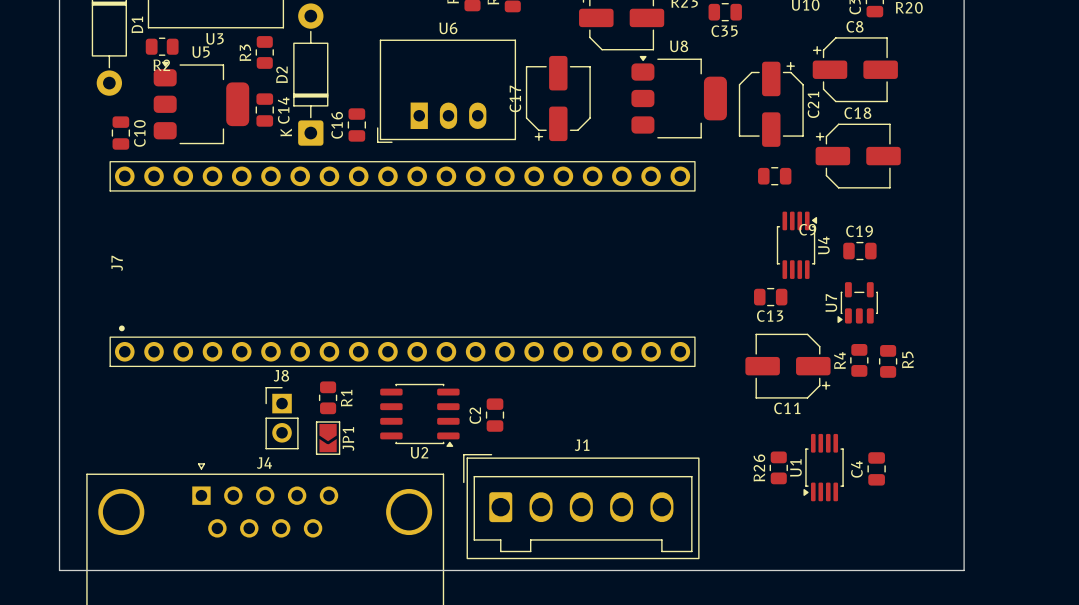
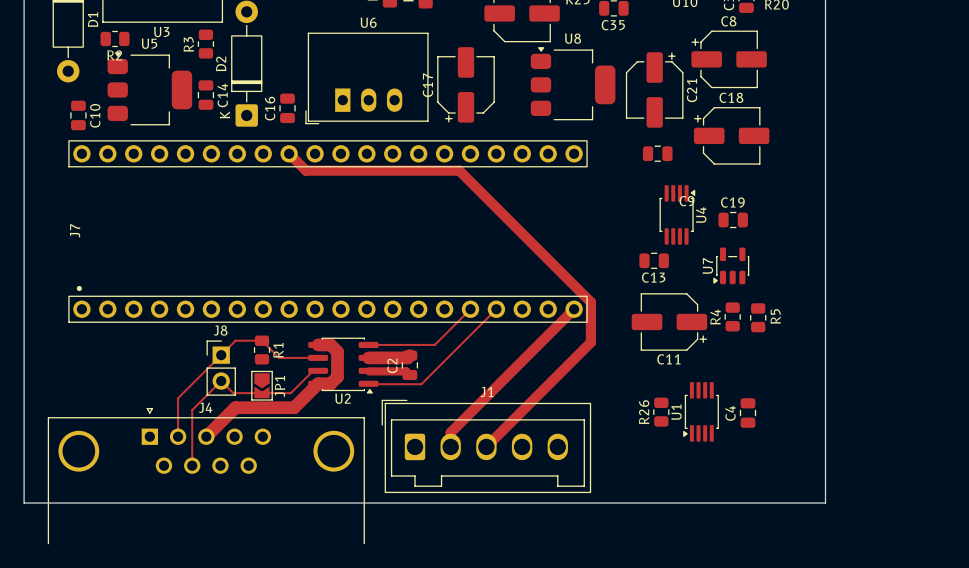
track: none -> (289, 153) (305, 170) (459, 170) (590, 302) (590, 342) (486, 446)
track: none -> (470, 309) (434, 344) (368, 344)
track: none -> (496, 309) (421, 384) (368, 383)
track: none -> (574, 309) (450, 432) (450, 446)
track: none -> (318, 344) (330, 344) (337, 351) (337, 376) (330, 383) (318, 383) (294, 407) (235, 407) (206, 436)
track: none -> (409, 355) (407, 357) (368, 357)
track: none -> (318, 357) (279, 357) (262, 340) (235, 340) (178, 398) (178, 436)
track: none -> (318, 370) (313, 370) (290, 393) (233, 393) (221, 381) (192, 410) (192, 465)
track: none -> (369, 371) (406, 371) (409, 375)

